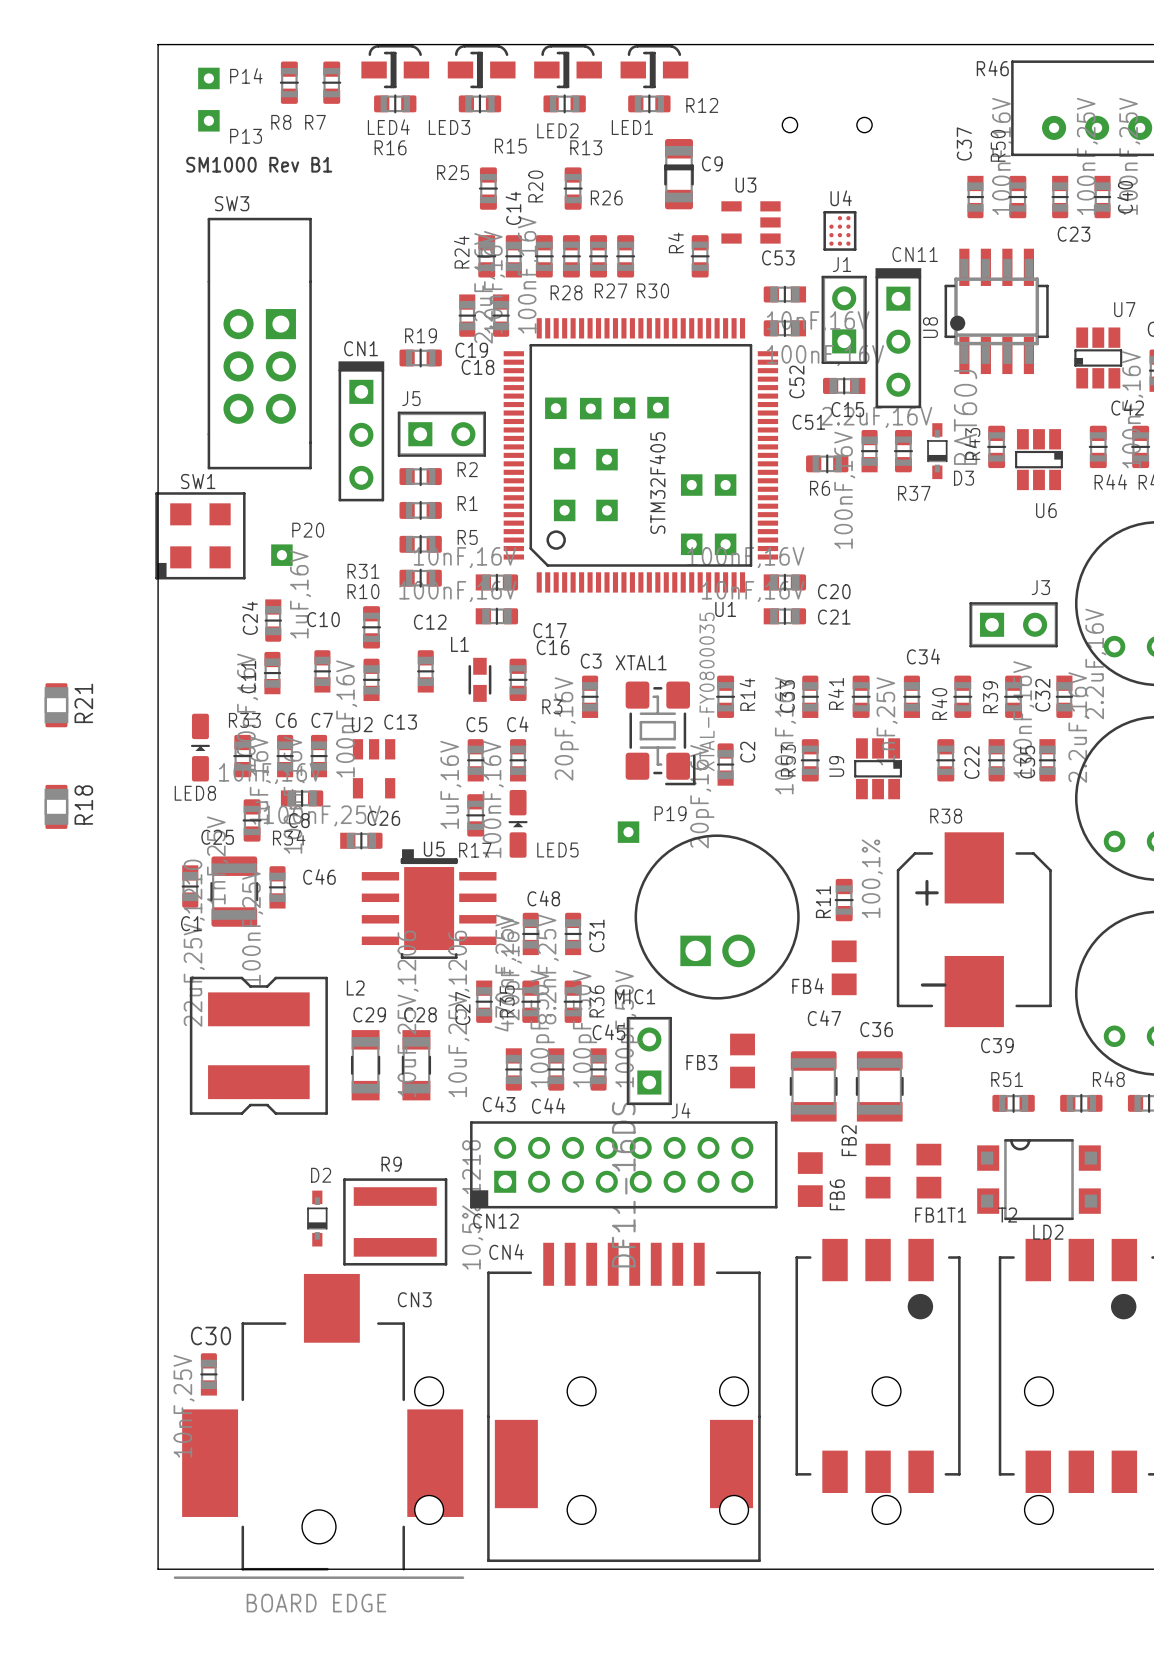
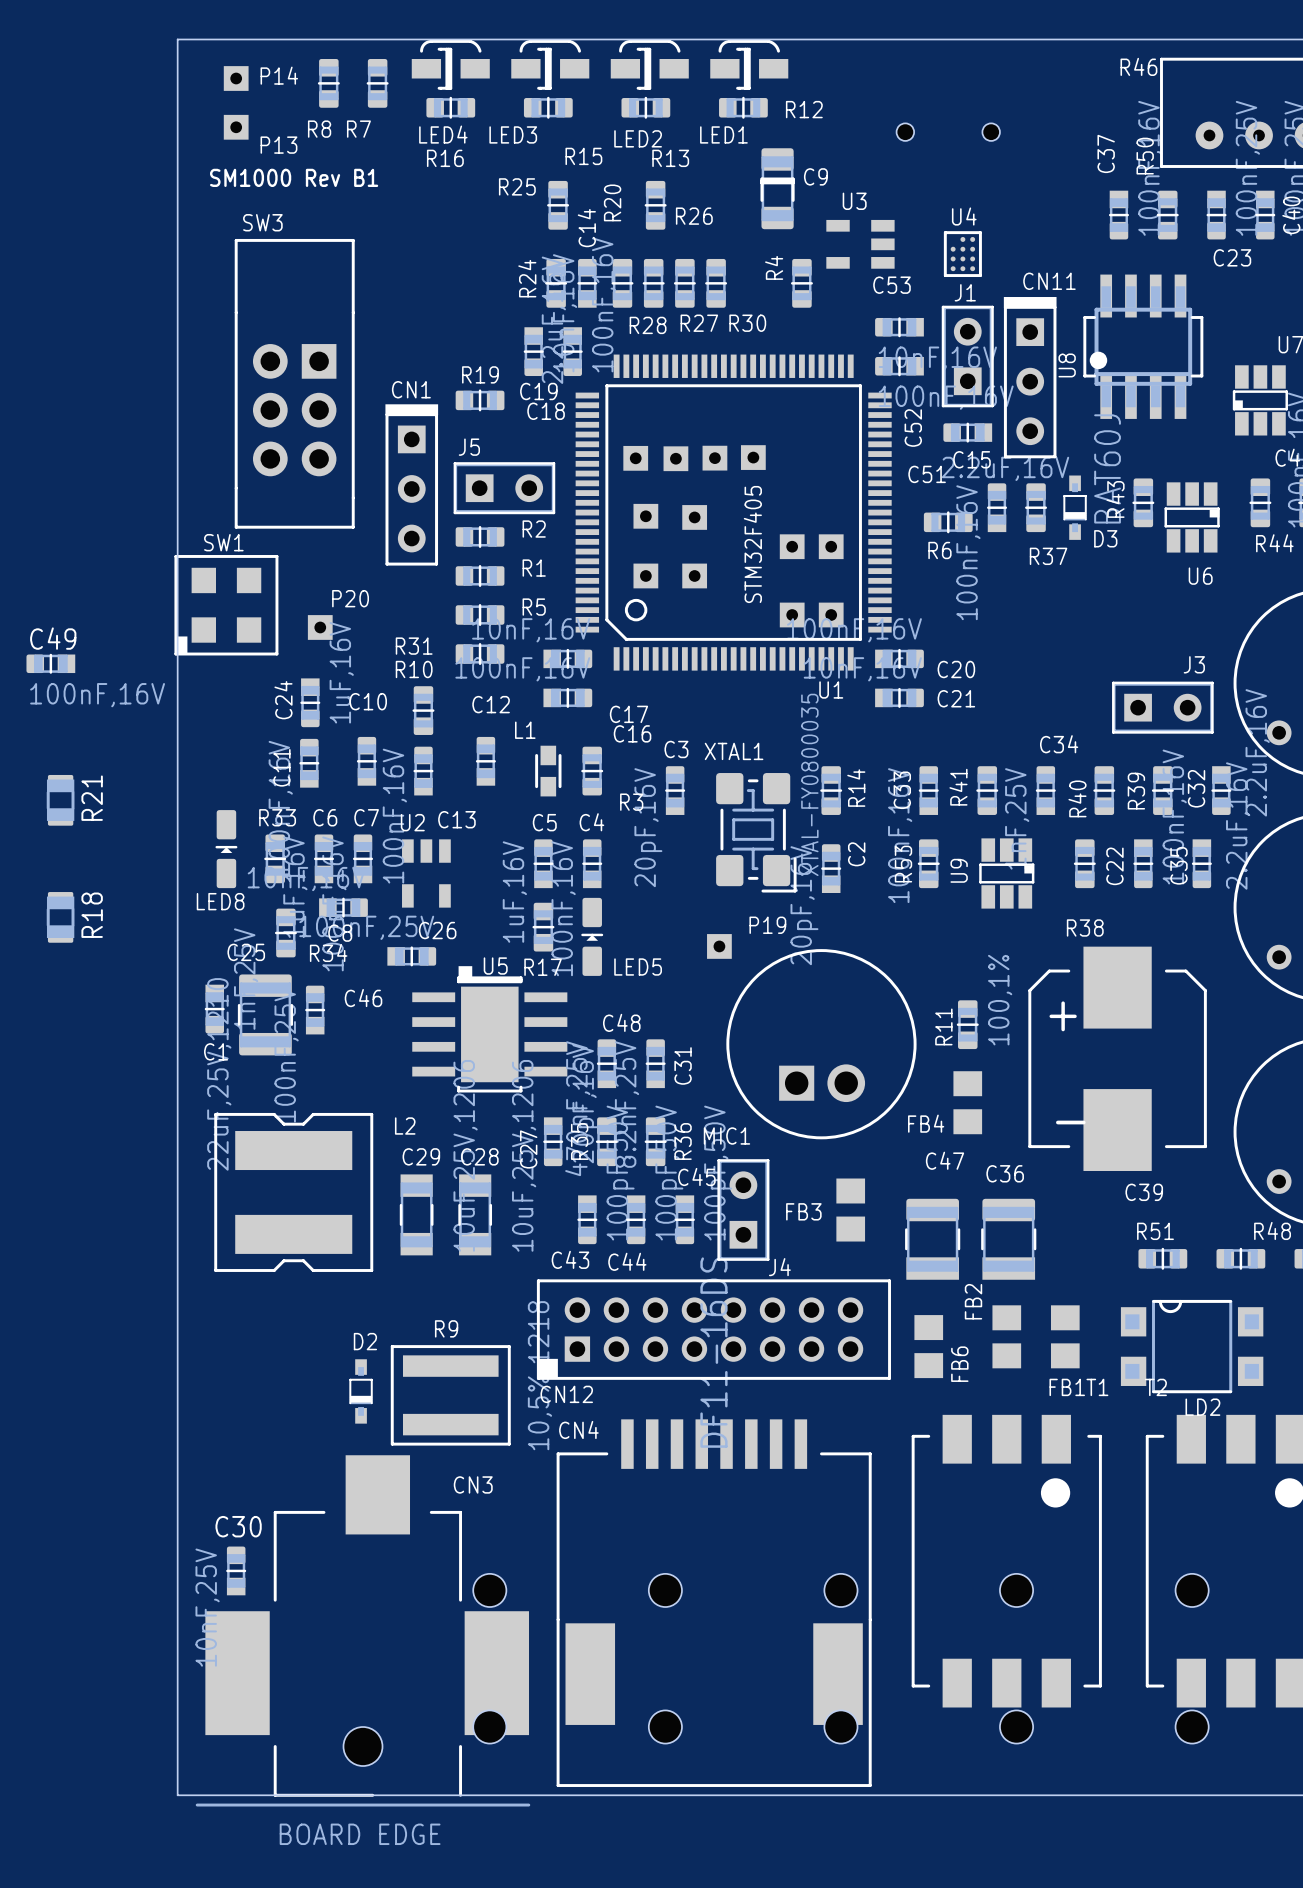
C49: none -> 100nF,16V (50, 663)

